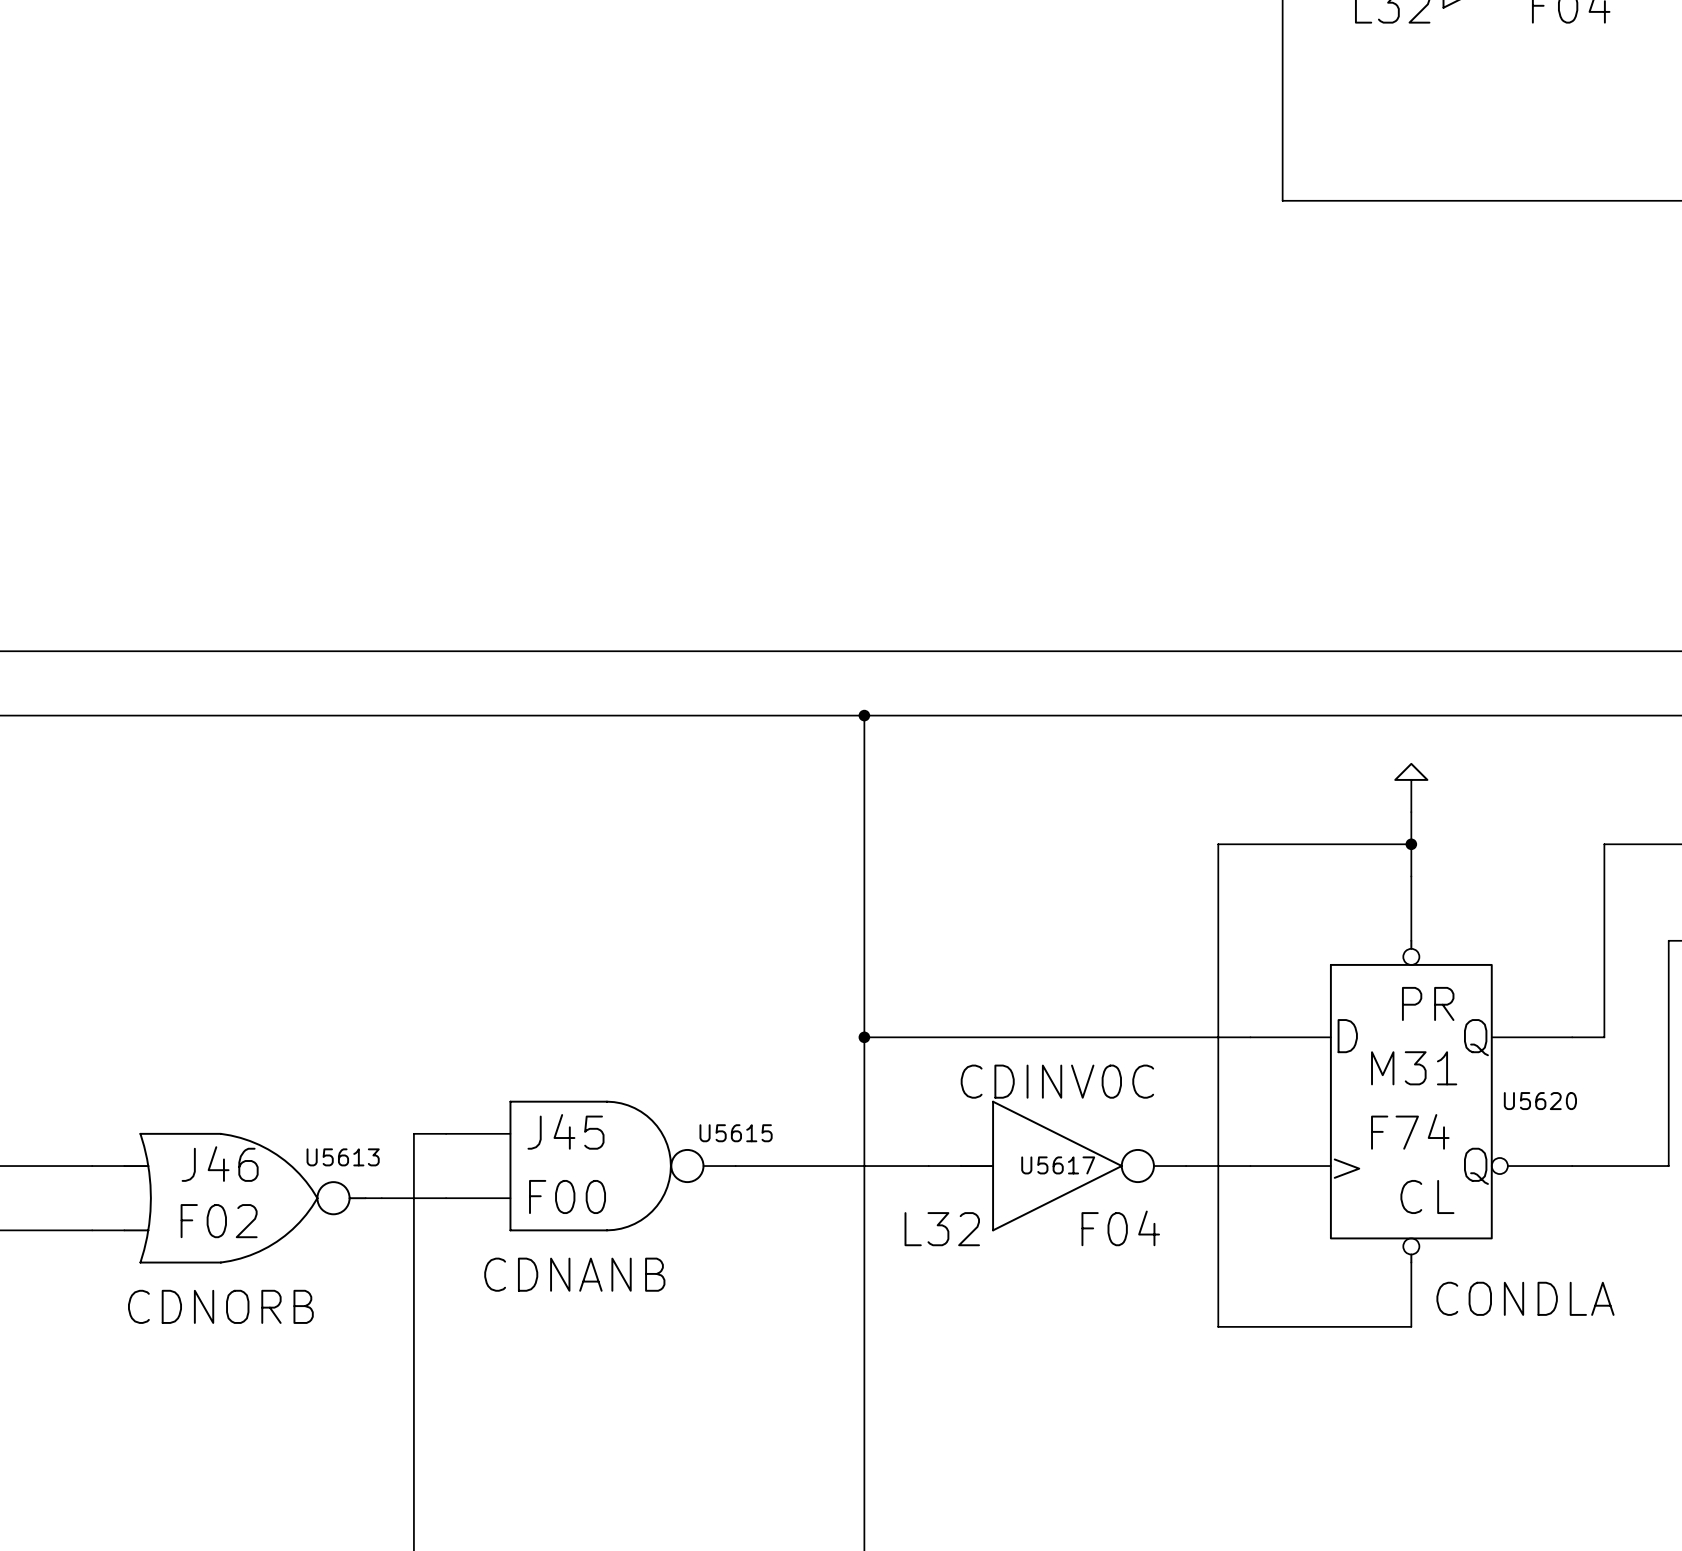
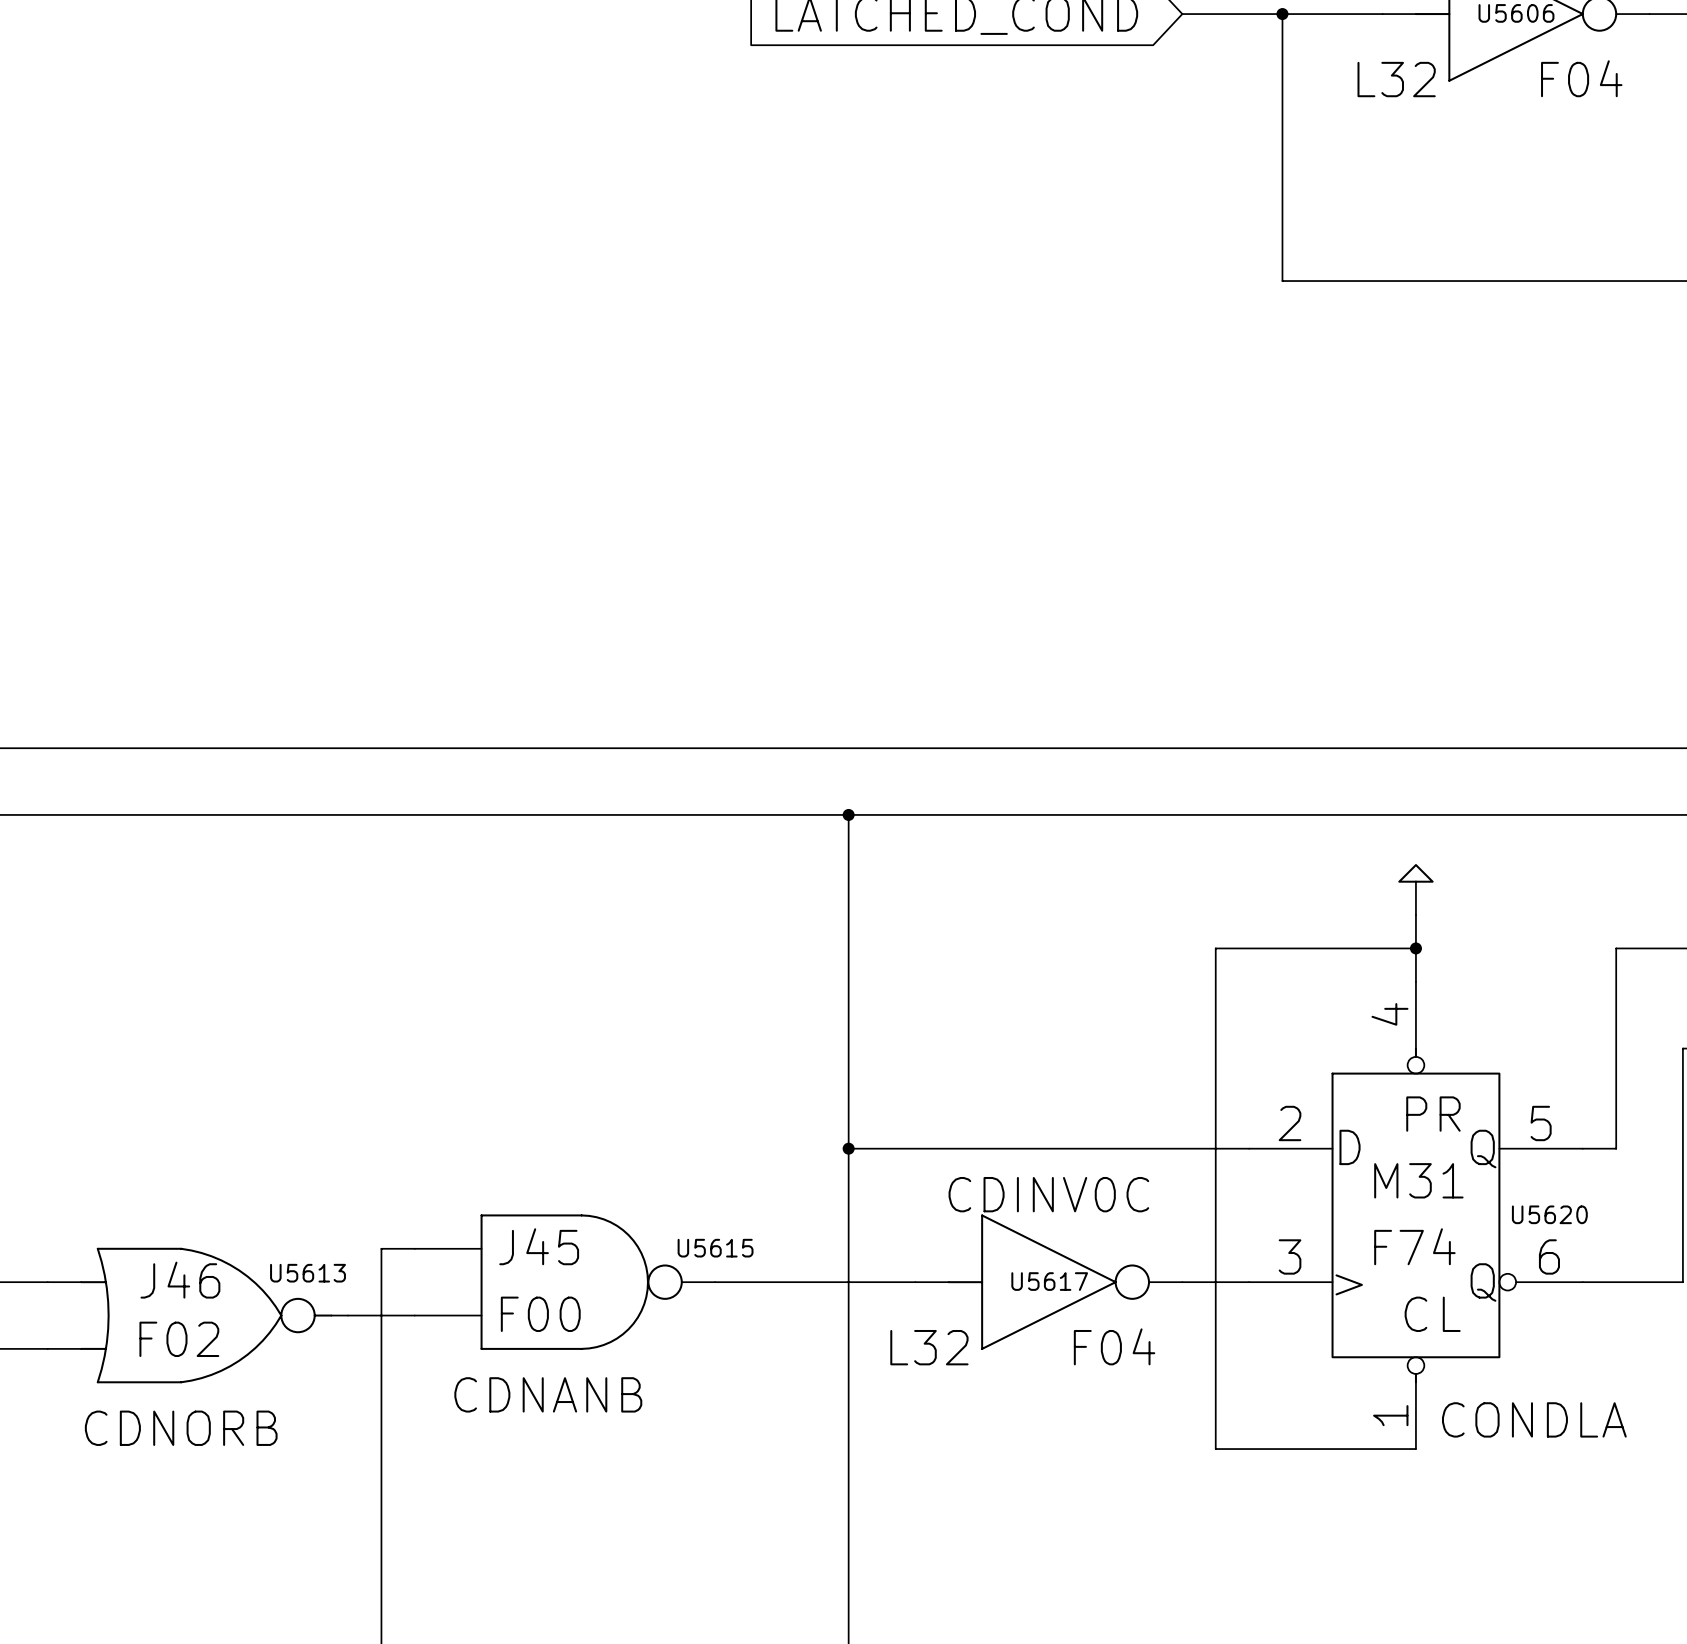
U5620 pin number: none -> 4 (1389, 1014)
U5620 pin number: none -> 2 (1290, 1123)
U5620 pin number: none -> 5 (1541, 1123)
U5620 pin number: none -> 3 (1290, 1256)
U5620 pin number: none -> 6 (1549, 1256)
U5620 pin number: none -> 1 (1390, 1415)

